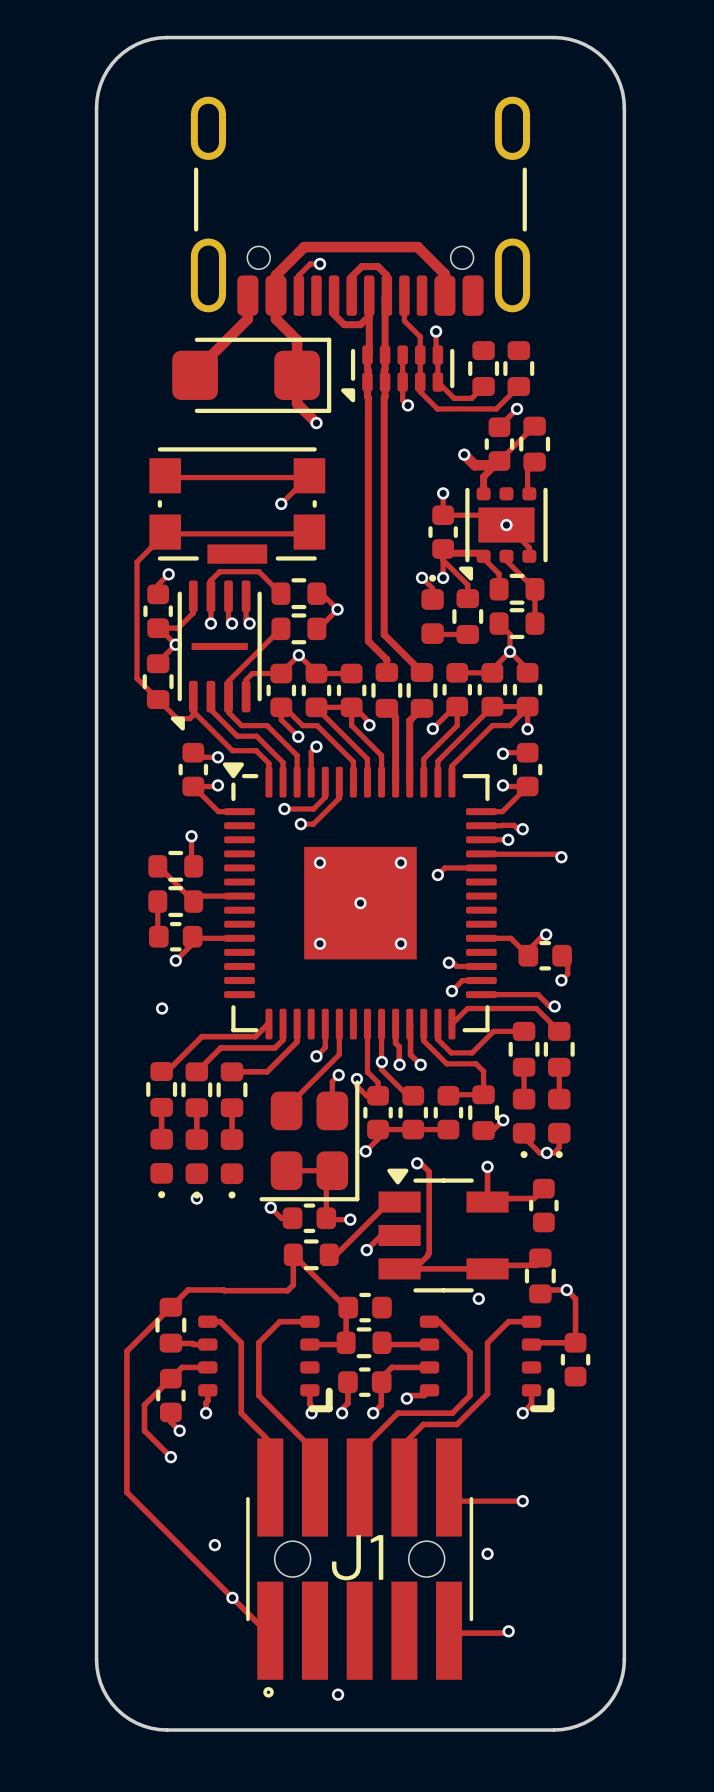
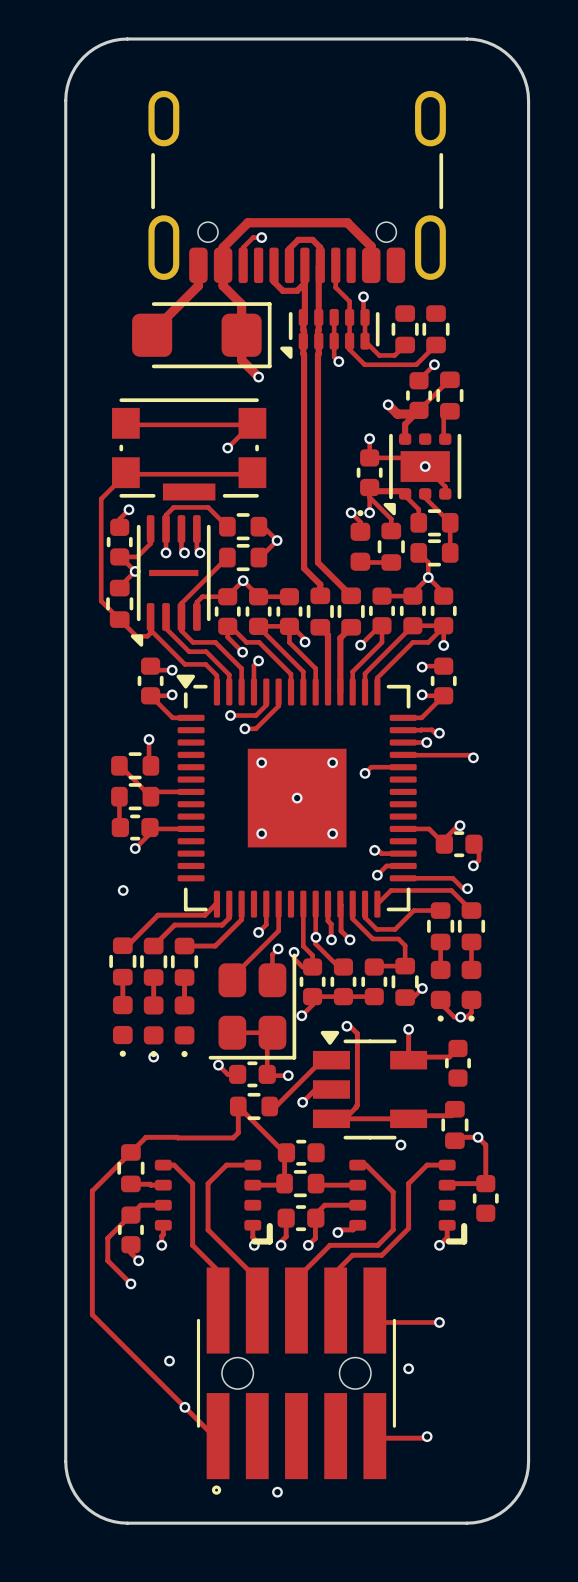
J1 name: J1 (357, 1557) -> none

